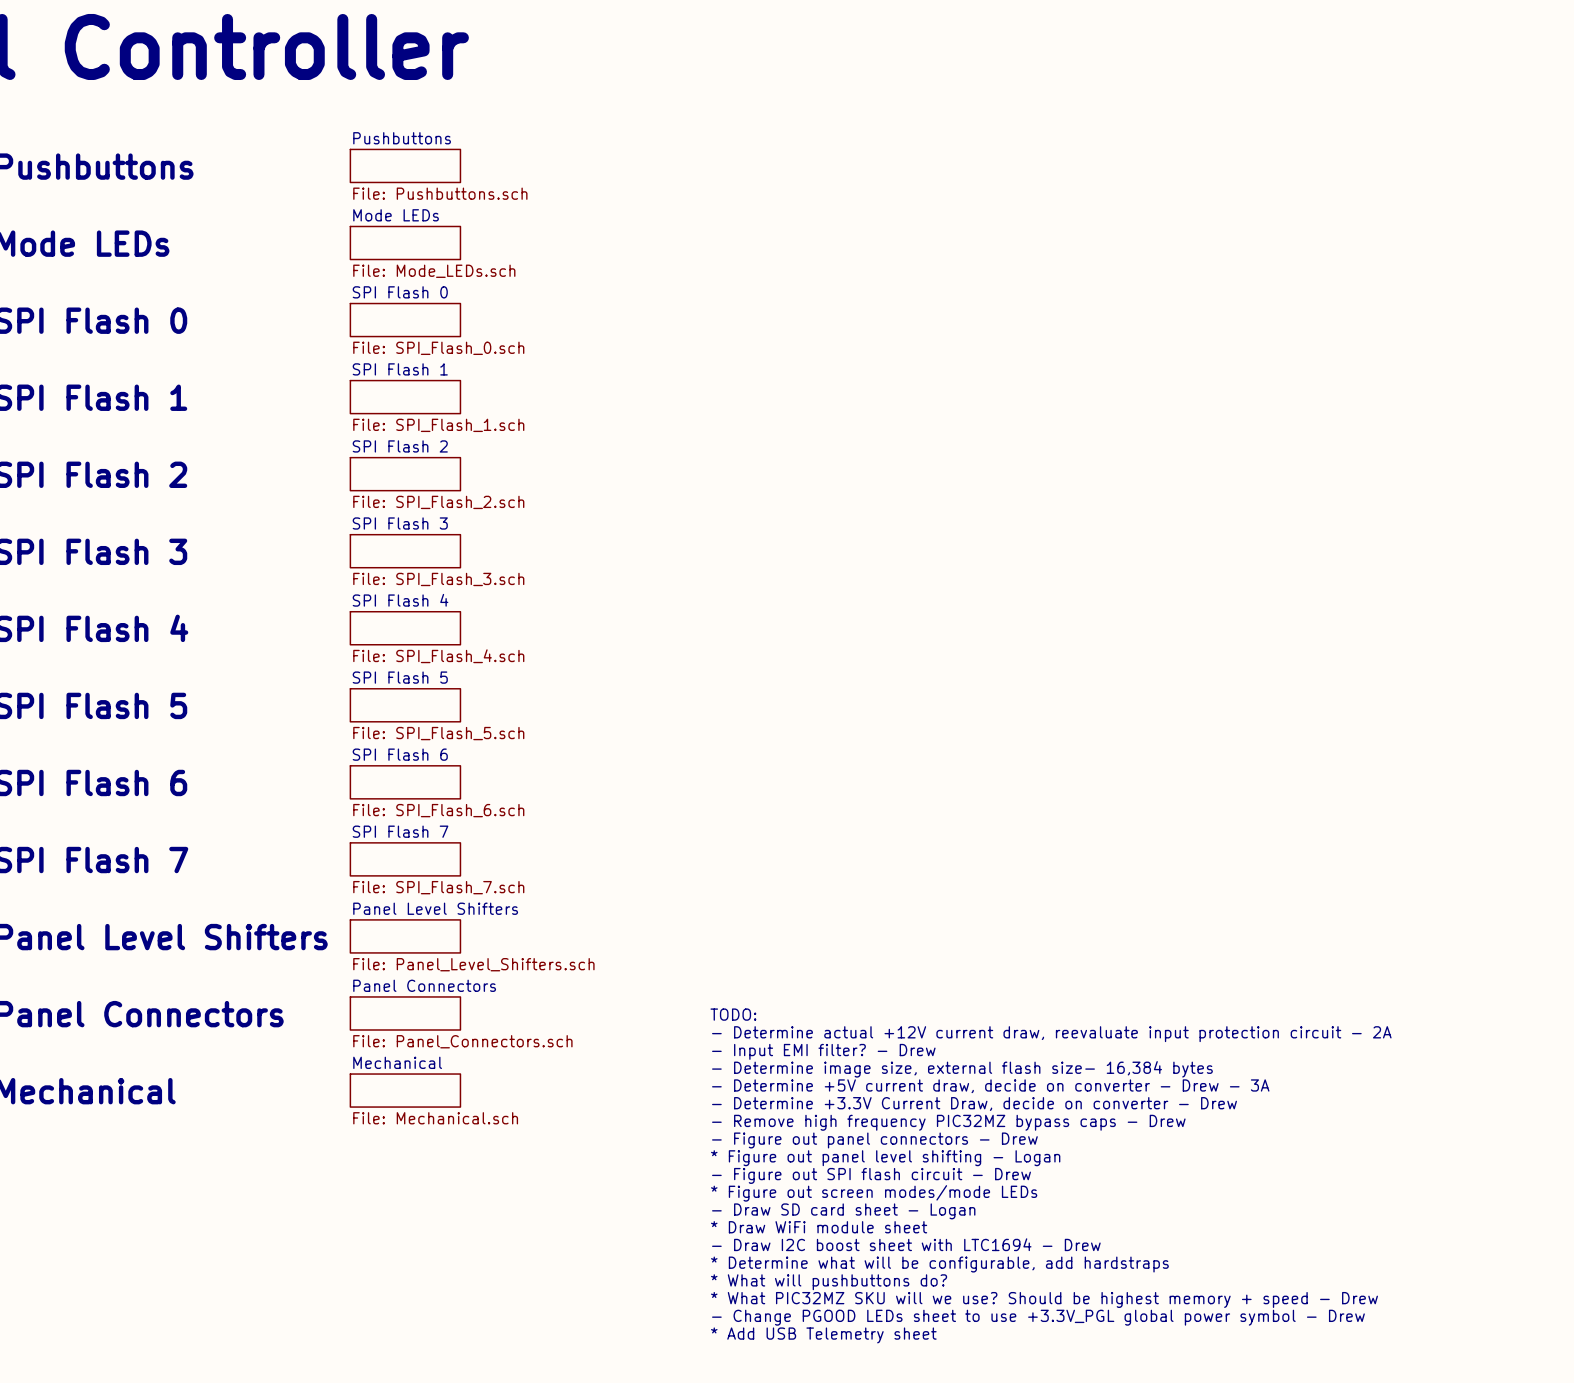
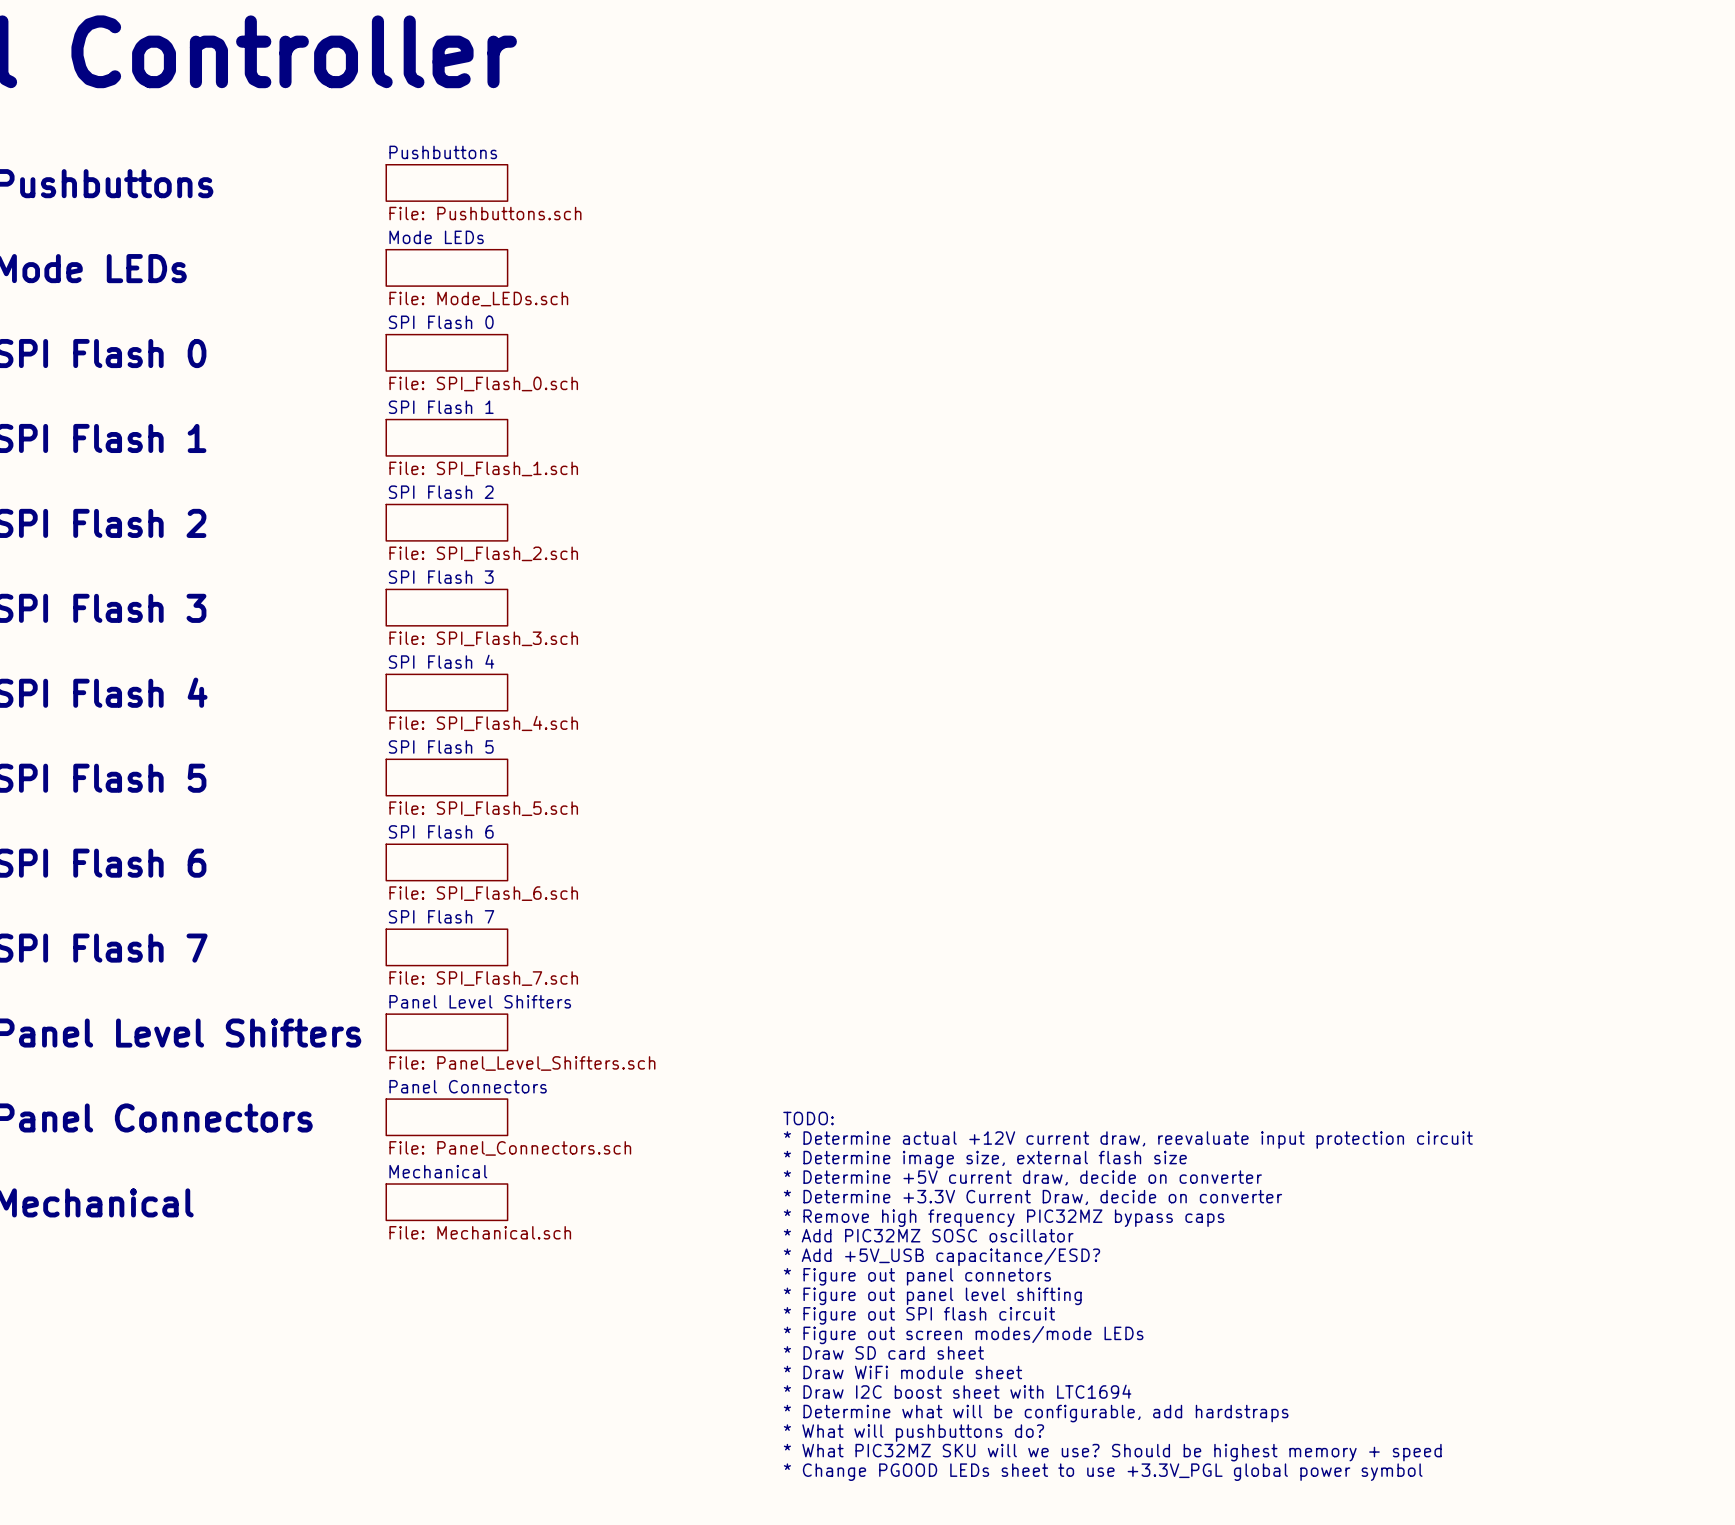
text: - Determine actual +12V current draw, reevaluate input protection circuit - 2A (1051, 1034) -> * Determine actual +12V current draw, reevaluate input protection circuit (1128, 1140)
text: - Input EMI filter? - Drew (823, 1051) -> * Determine image size, external flash size (985, 1159)
text: - Determine image size, external flash size- 16,384 bytes (962, 1069) -> * Determine +5V current draw, decide on converter (1022, 1177)
text: - Determine +5V current draw, decide on converter - Drew - 3A (990, 1086) -> * Determine +3.3V Current Draw, decide on converter (1032, 1197)
text: - Determine +3.3V Current Draw, decide on converter - Drew (974, 1103) -> * Remove high frequency PIC32MZ bypass caps (1004, 1218)
text: - Remove high frequency PIC32MZ bypass caps - Drew (948, 1122) -> * Add PIC32MZ SOSC oscillator (928, 1235)
text: - Figure out panel connectors - Drew (874, 1140) -> * Add +5V_USB capacitance/ESD? (941, 1256)
text: * Figure out panel level shifting - Logan (885, 1158) -> * Figure out panel connetors (917, 1276)
text: - Figure out SPI flash circuit - Drew (871, 1175) -> * Figure out panel level shifting (932, 1296)
text: * Figure out screen modes/mode LEDs (874, 1193) -> * Figure out SPI flash circuit (919, 1315)
text: - Draw SD card sheet - Logan (843, 1211) -> * Figure out screen modes/mode LEDs (963, 1335)
text: * Draw WiFi module sheet (819, 1227) -> * Draw SD card sheet (883, 1352)
text: - Draw I2C boost sheet with LTC1694 - Drew (906, 1244) -> * Draw WiFi module sheet (902, 1372)
text: * Determine what will be configurable, add hardstraps (939, 1264) -> * Draw I2C boost sheet with LTC1694 (957, 1391)
text: * What will pushbuttons do? (829, 1282) -> * Determine what will be configurable, add hardstraps (1036, 1413)
text: * What PIC32MZ SKU will we use? Should be highest memory + speed - Drew (1044, 1299) -> * What will pushbuttons do? (913, 1433)
text: - Change PGOOD LEDs sheet to use +3.3V_PGL global power symbol - Drew (1038, 1317) -> * What PIC32MZ SKU will we use? Should be highest memory + speed (1112, 1452)
text: * Add USB Telemetry sheet (823, 1335) -> * Change PGOOD LEDs sheet to use +3.3V_PGL global power symbol (1103, 1472)

